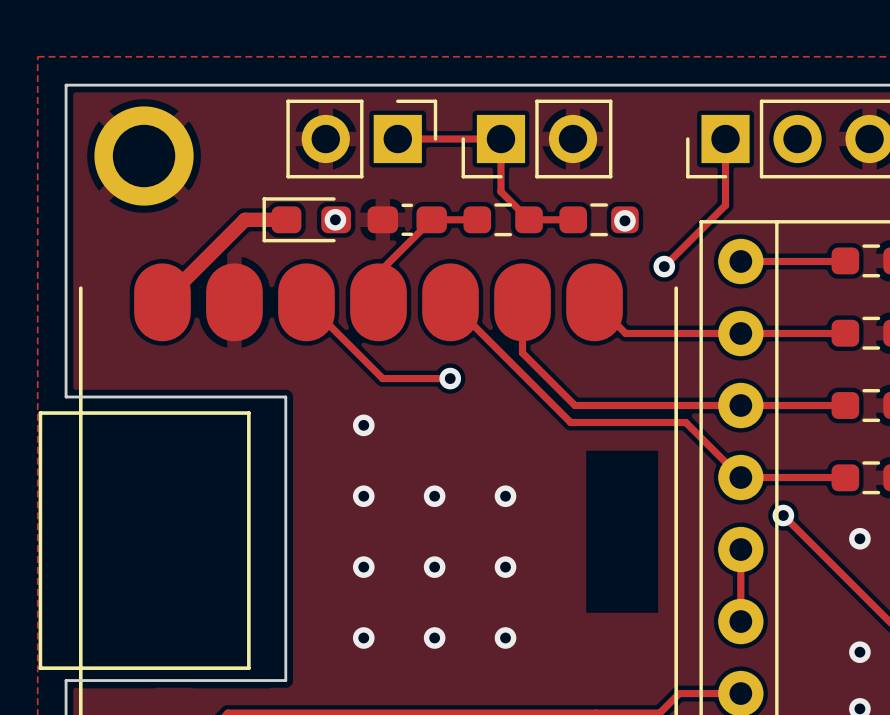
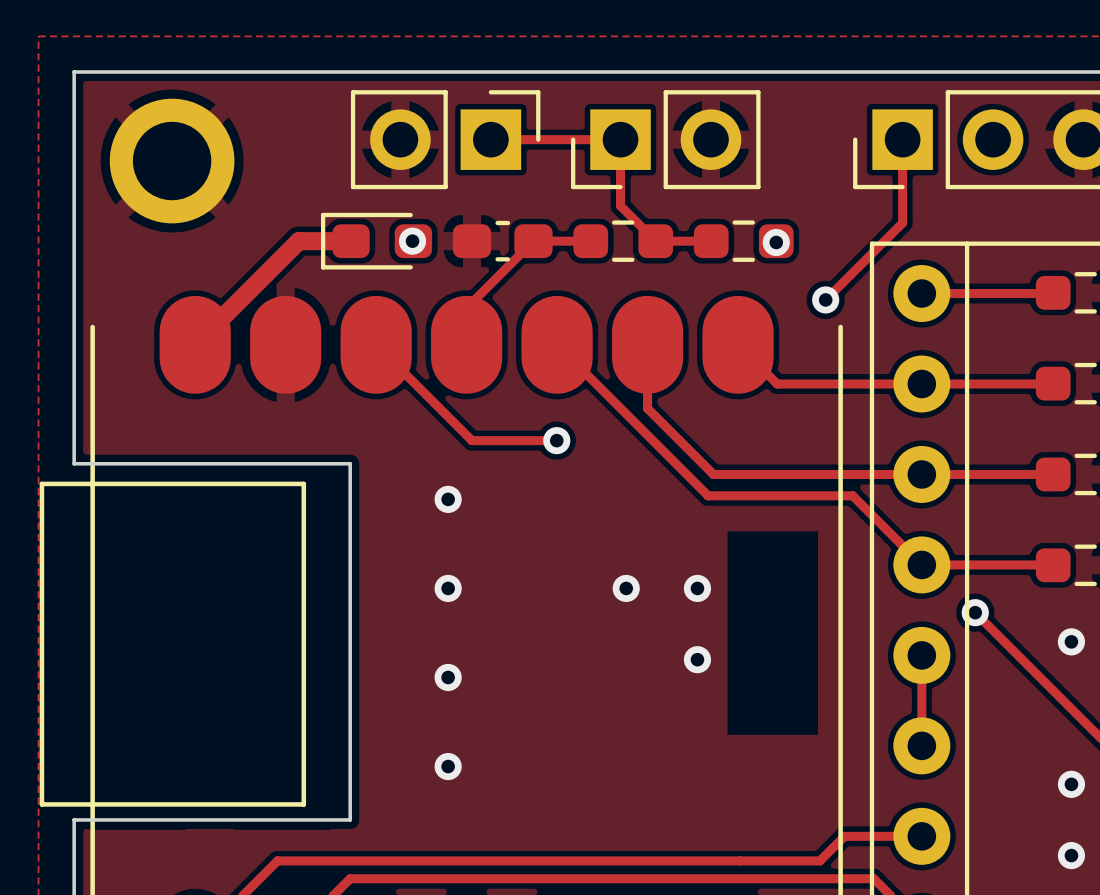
via: (434, 496) -> none
via: none -> (697, 588)
via: none -> (697, 659)
via: (434, 567) -> none
via: (505, 567) -> none
via: (434, 637) -> none
via: (505, 637) -> none

